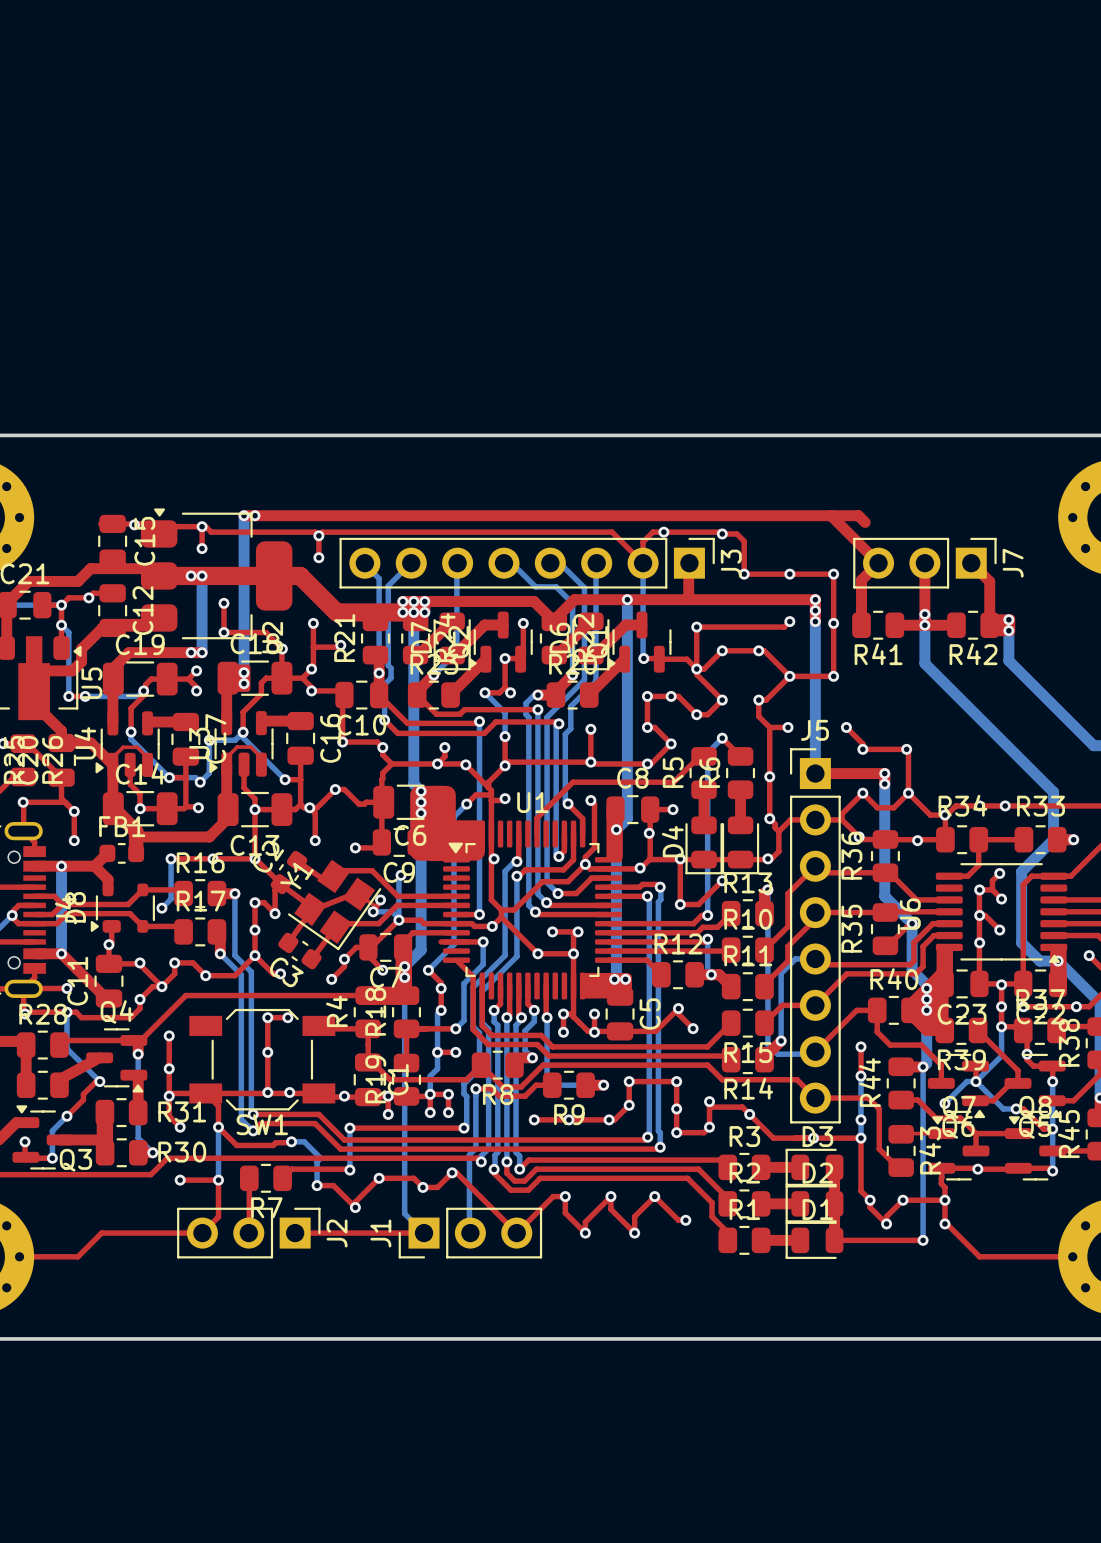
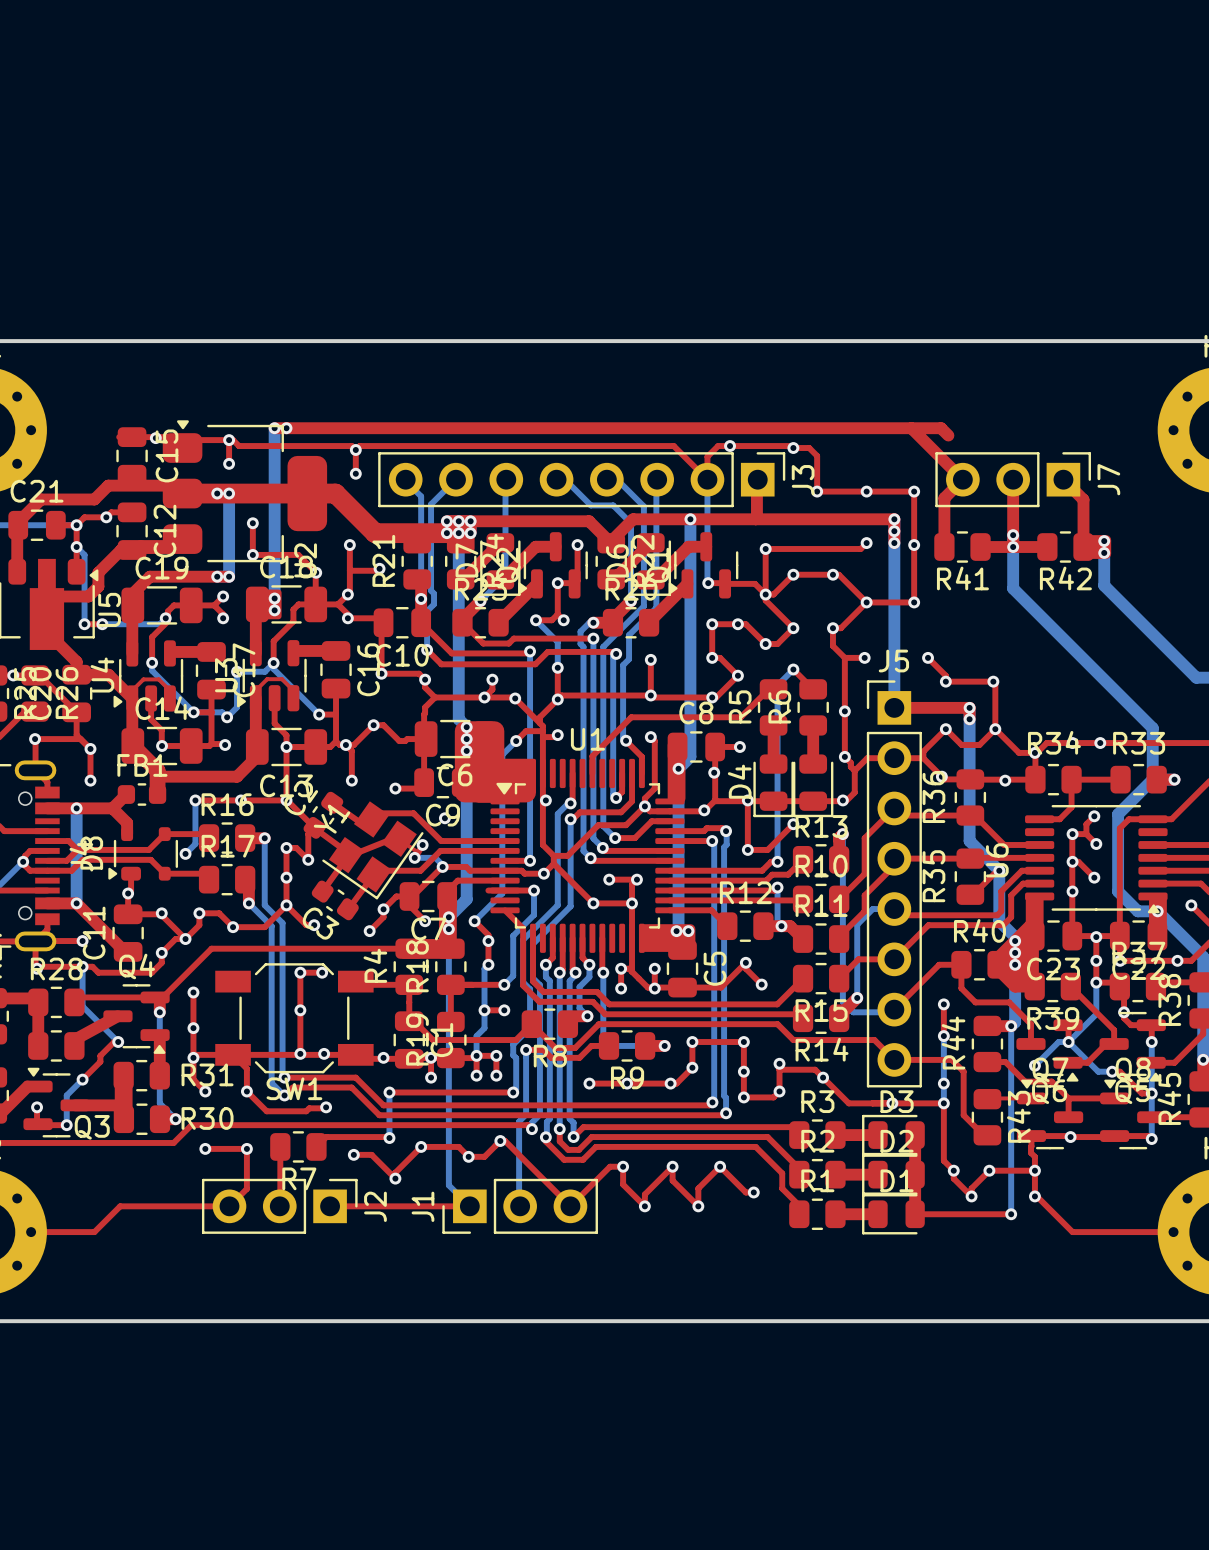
bottom track: (401, 875) (398, 877) (398, 918) -> none
bottom track: (218, 1127) (218, 1180) -> none
bottom track: (291, 1141) (304, 1141) (320, 1158) (317, 1161) (317, 1185) -> none

